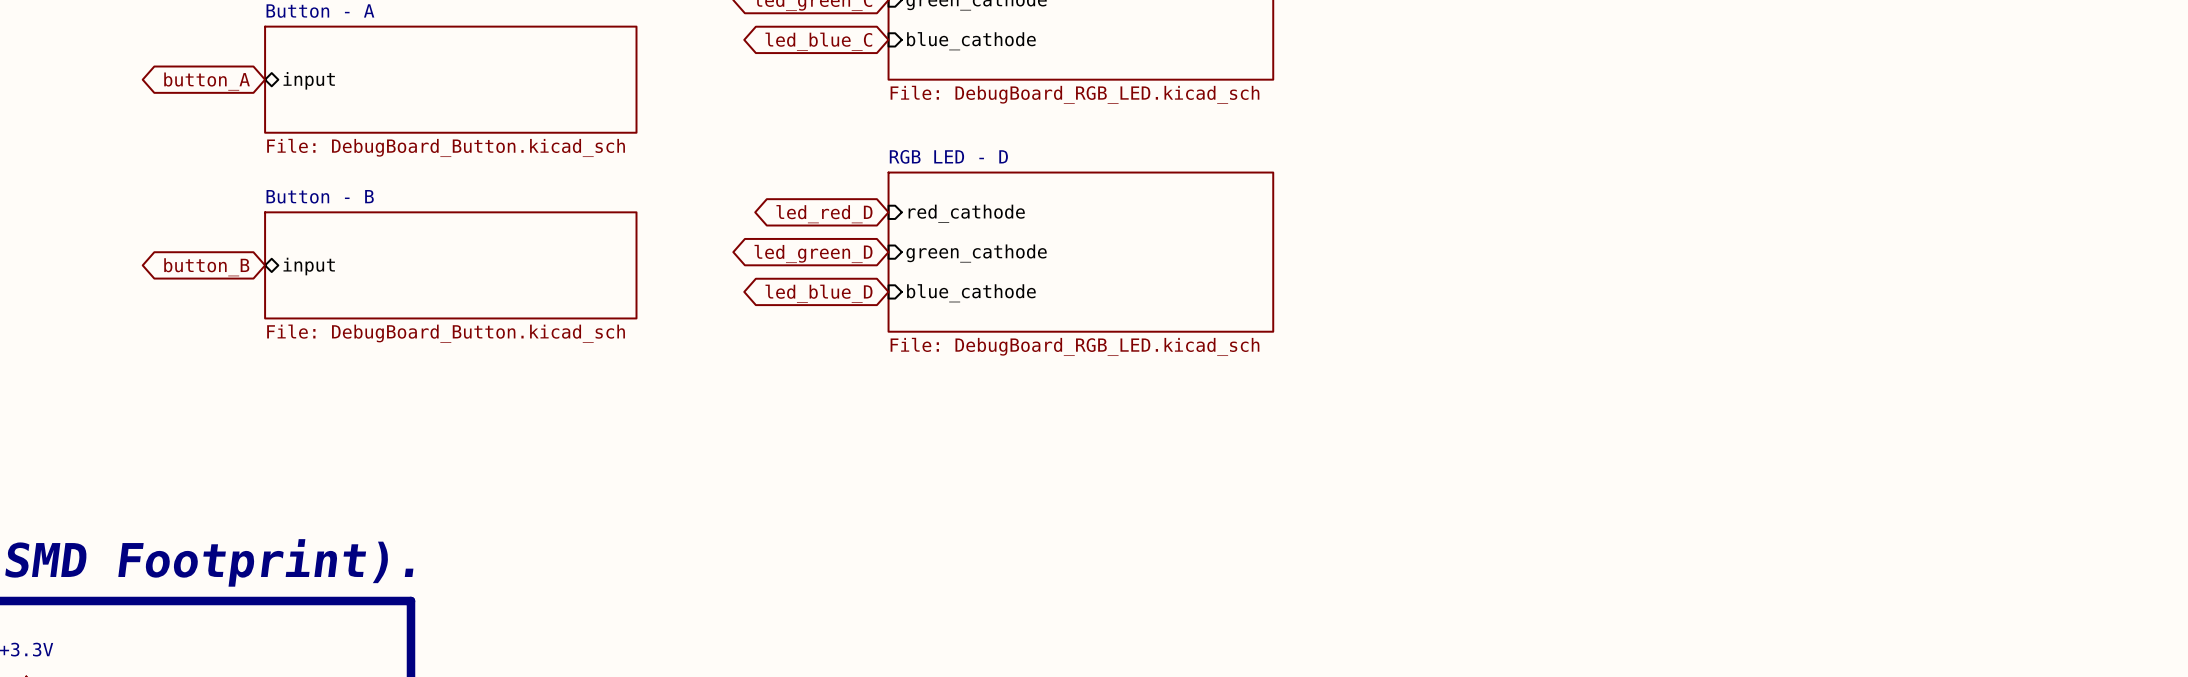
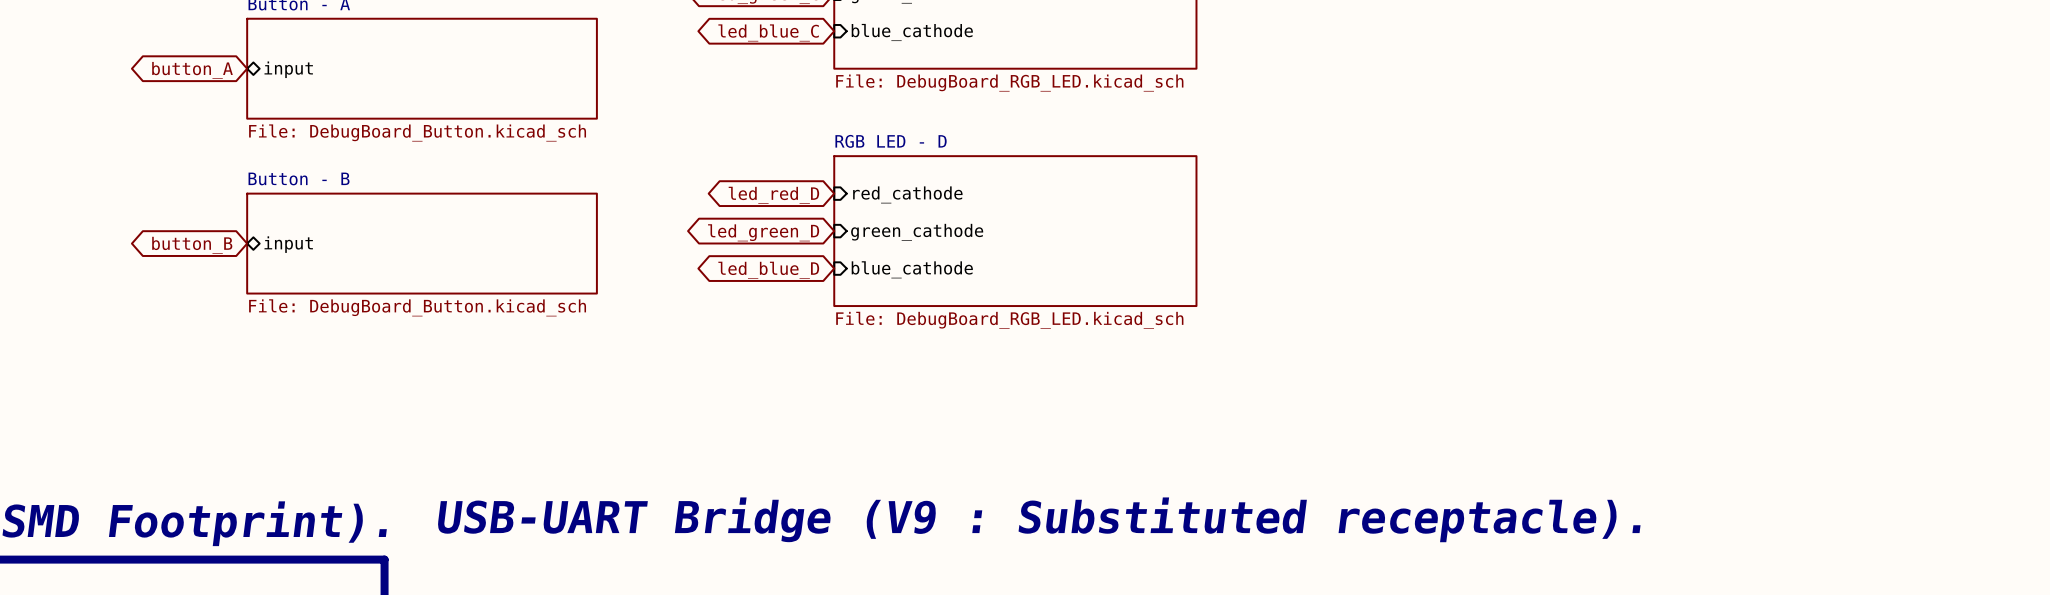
text: none -> USB-UART Bridge (V9 : Substituted receptacle). (1038, 519)

